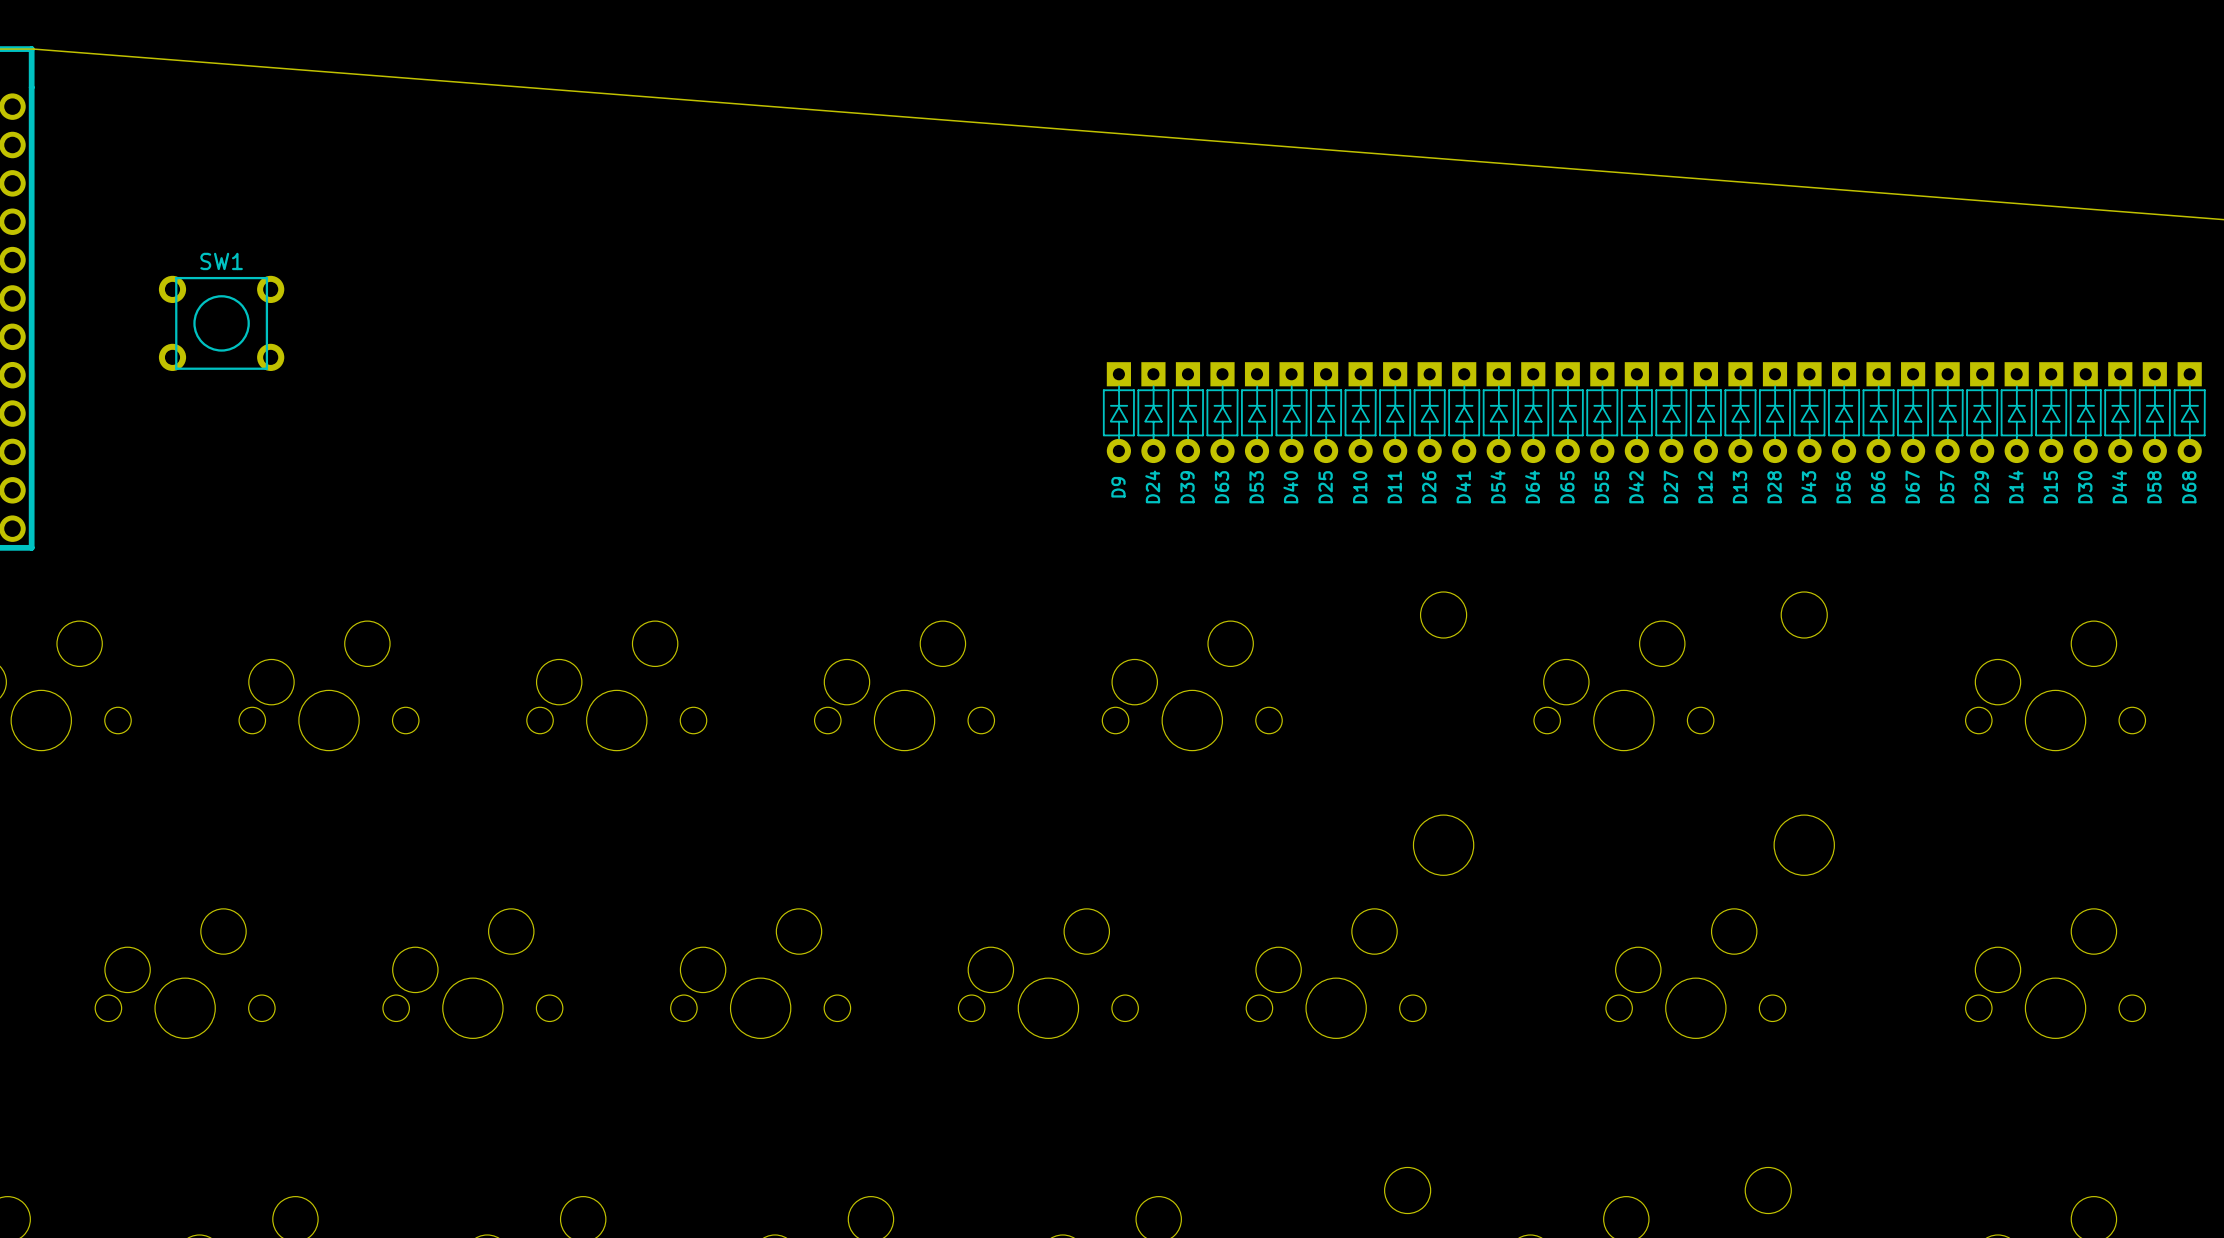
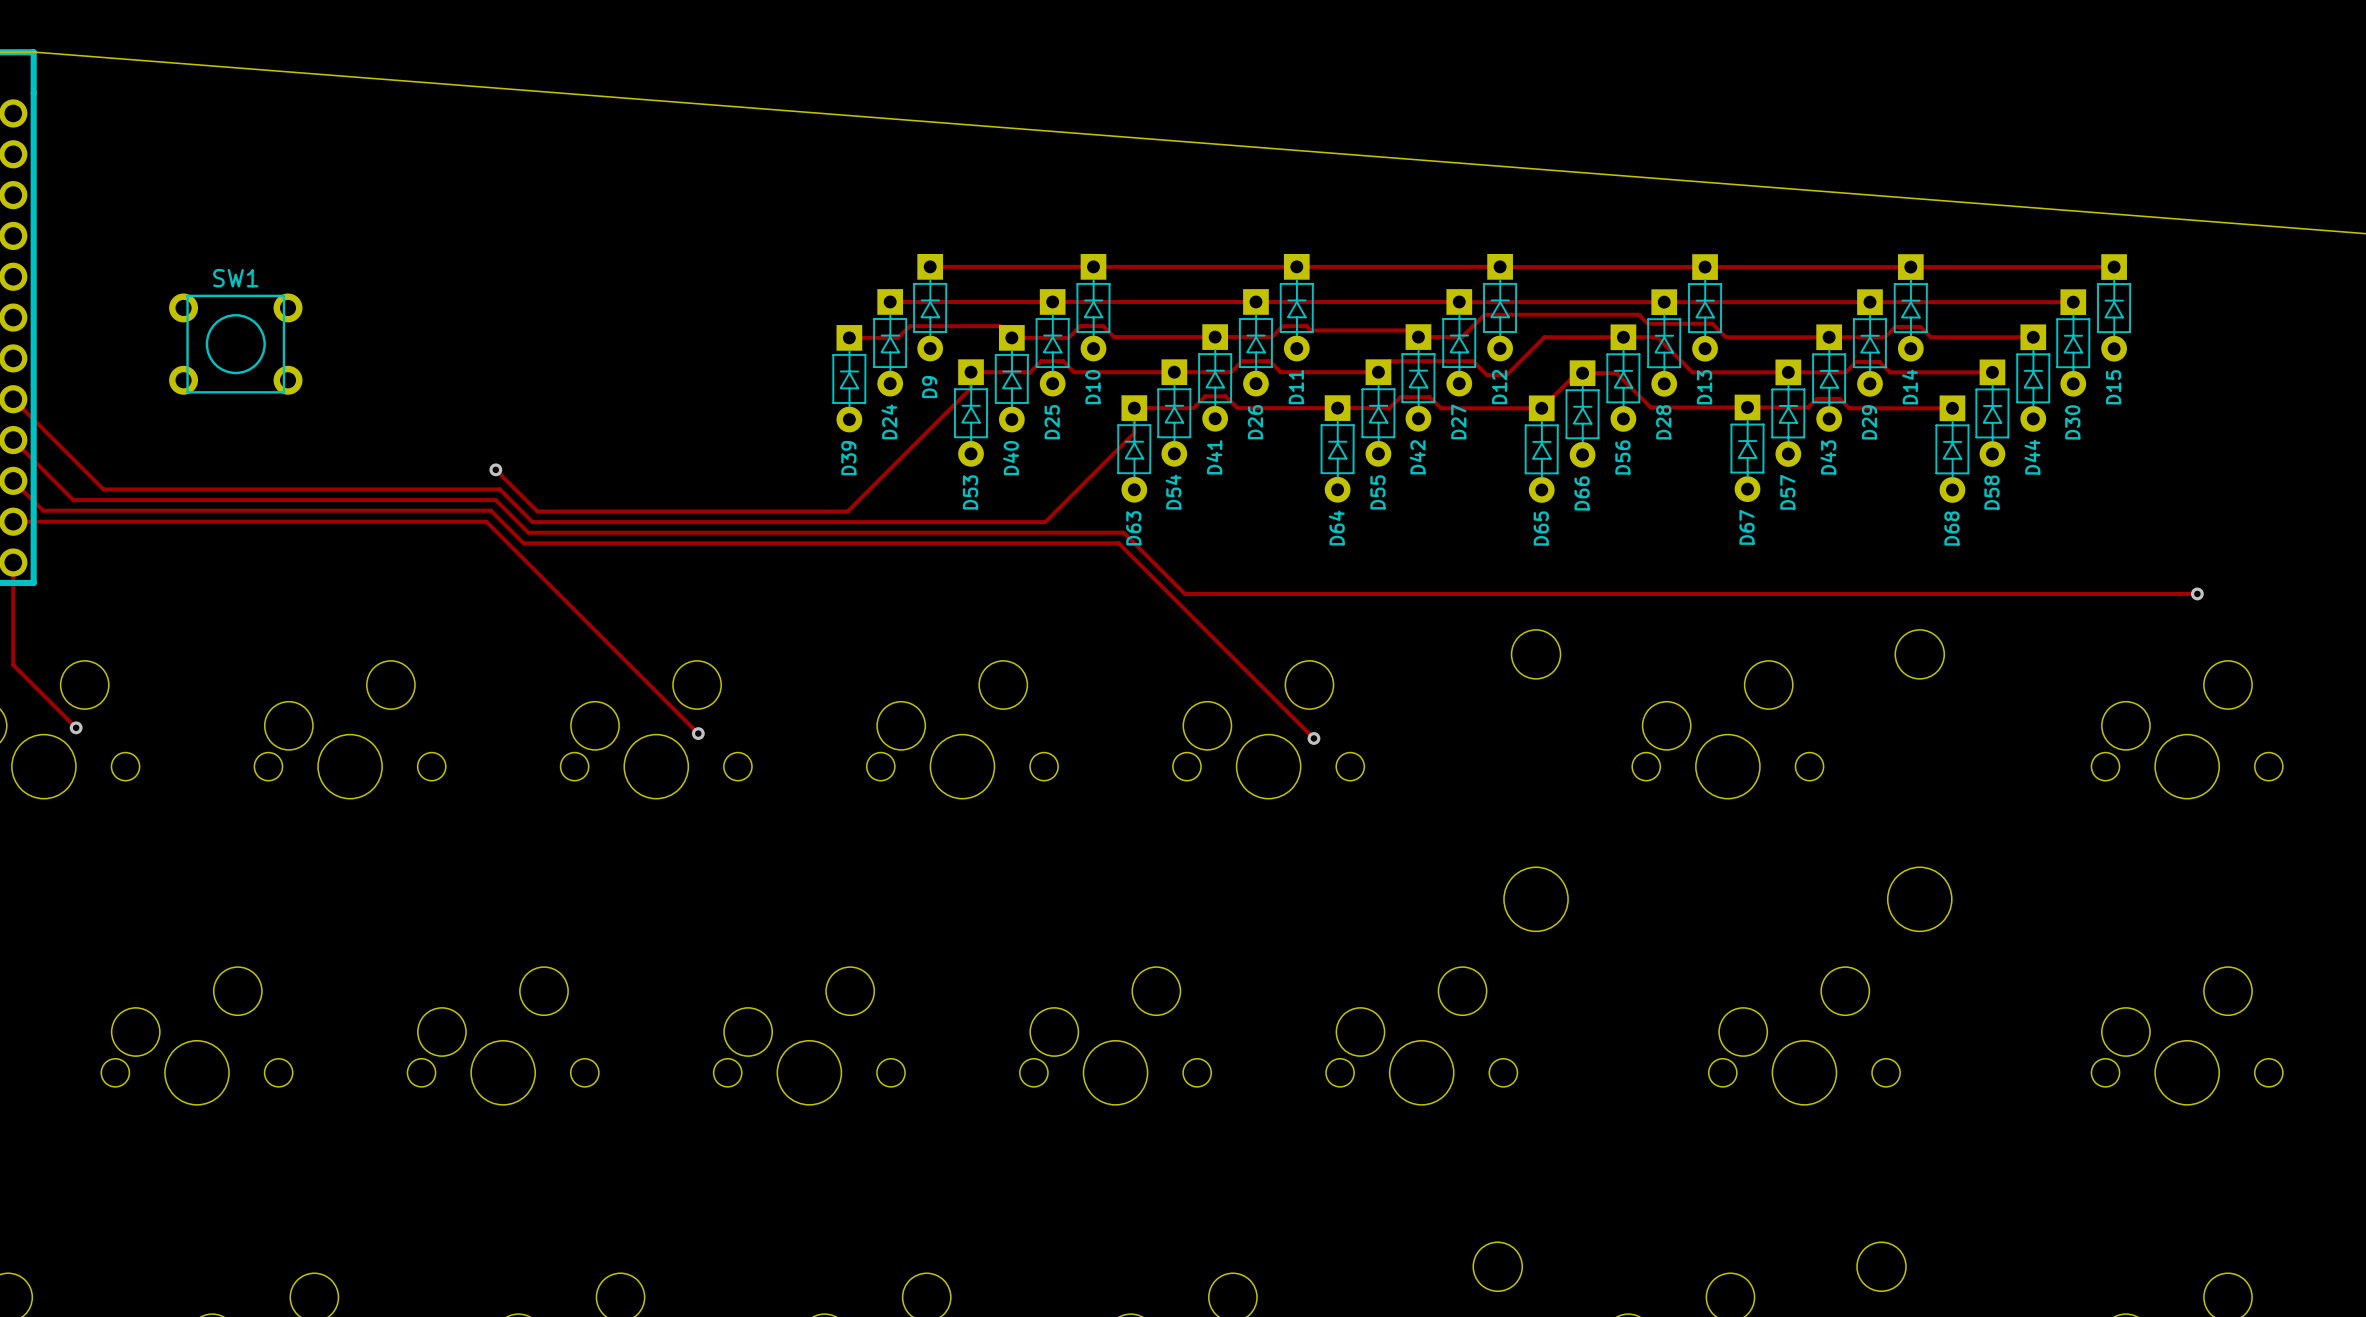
track: none -> (930, 266) (1500, 266)
track: none -> (1500, 267) (2114, 267)
track: none -> (890, 301) (1459, 301)
track: none -> (1459, 302) (2073, 302)
track: none -> (2033, 337) (1930, 337) (1920, 326) (1895, 326) (1884, 337) (1725, 337) (1712, 323) (1647, 323) (1638, 314) (1484, 314) (1462, 337) (1418, 337) (1411, 330) (1310, 330) (1306, 326) (1282, 326) (1271, 337) (1114, 337) (1103, 326) (1080, 326) (1068, 337) (1011, 337) (1000, 326) (909, 326) (898, 337) (849, 337)
track: none -> (1992, 372) (1890, 372) (1879, 362) (1856, 362) (1845, 372) (1692, 372) (1657, 337) (1544, 337) (1506, 375) (1487, 375) (1473, 361) (1389, 361) (1378, 372) (1280, 372) (1269, 361) (1242, 361) (1231, 372) (1074, 372) (1063, 361) (1041, 361) (1029, 372) (971, 372) (971, 388) (847, 511) (537, 511) (495, 469)
D56 footprint: [1828, 362, 1861, 464] -> [1606, 324, 1641, 432]
track: none -> (13, 399) (103, 489) (499, 489) (532, 522) (1045, 522) (1134, 433) (1134, 408) (1193, 408) (1205, 396) (1225, 396) (1237, 408) (1389, 408) (1400, 397) (1429, 397) (1441, 408) (1541, 408) (1576, 373) (1616, 373) (1650, 407) (1807, 407) (1816, 398) (1839, 398) (1849, 408) (1952, 408)
D9 position: (1118, 412) -> (930, 307)
D24 position: (1153, 412) -> (890, 342)
D39 position: (1187, 412) -> (849, 378)
D63 position: (1222, 412) -> (1134, 448)
D53 position: (1257, 412) -> (971, 413)
D40 position: (1291, 412) -> (1011, 378)
D25 position: (1326, 412) -> (1052, 342)
D10 position: (1360, 412) -> (1093, 307)
D11 position: (1395, 412) -> (1296, 307)
D26 position: (1429, 412) -> (1255, 342)
D41 position: (1464, 412) -> (1215, 377)
D54 position: (1498, 412) -> (1174, 413)
D64 position: (1533, 412) -> (1337, 448)
D65 position: (1567, 412) -> (1541, 449)
D55 position: (1602, 412) -> (1378, 413)
D42 position: (1636, 412) -> (1418, 377)
D27 position: (1671, 412) -> (1459, 342)
D12 position: (1705, 412) -> (1500, 307)
D13 position: (1740, 412) -> (1705, 307)
D28 position: (1774, 412) -> (1664, 342)
D43 position: (1809, 412) -> (1829, 378)
D66 position: (1878, 412) -> (1582, 414)
D67 position: (1913, 412) -> (1747, 448)
D57 position: (1947, 412) -> (1788, 413)
D29 position: (1982, 412) -> (1869, 342)
D14 position: (2016, 412) -> (1910, 307)
D15 position: (2051, 412) -> (2114, 307)
D30 position: (2085, 412) -> (2073, 342)
D44 position: (2120, 412) -> (2033, 378)
D58 position: (2154, 412) -> (1992, 413)
D68 position: (2189, 412) -> (1952, 449)
track: none -> (13, 440) (73, 500) (495, 500) (528, 532) (1123, 532) (1184, 593) (2197, 593)
via: none -> (495, 469)
track: none -> (13, 480) (43, 510) (490, 510) (523, 543) (1118, 543) (1313, 738)
track: none -> (13, 521) (486, 521) (698, 733)
track: none -> (13, 562) (13, 664) (76, 727)
via: none -> (2197, 593)
via: none -> (76, 727)
via: none -> (698, 733)
via: none -> (1313, 738)

